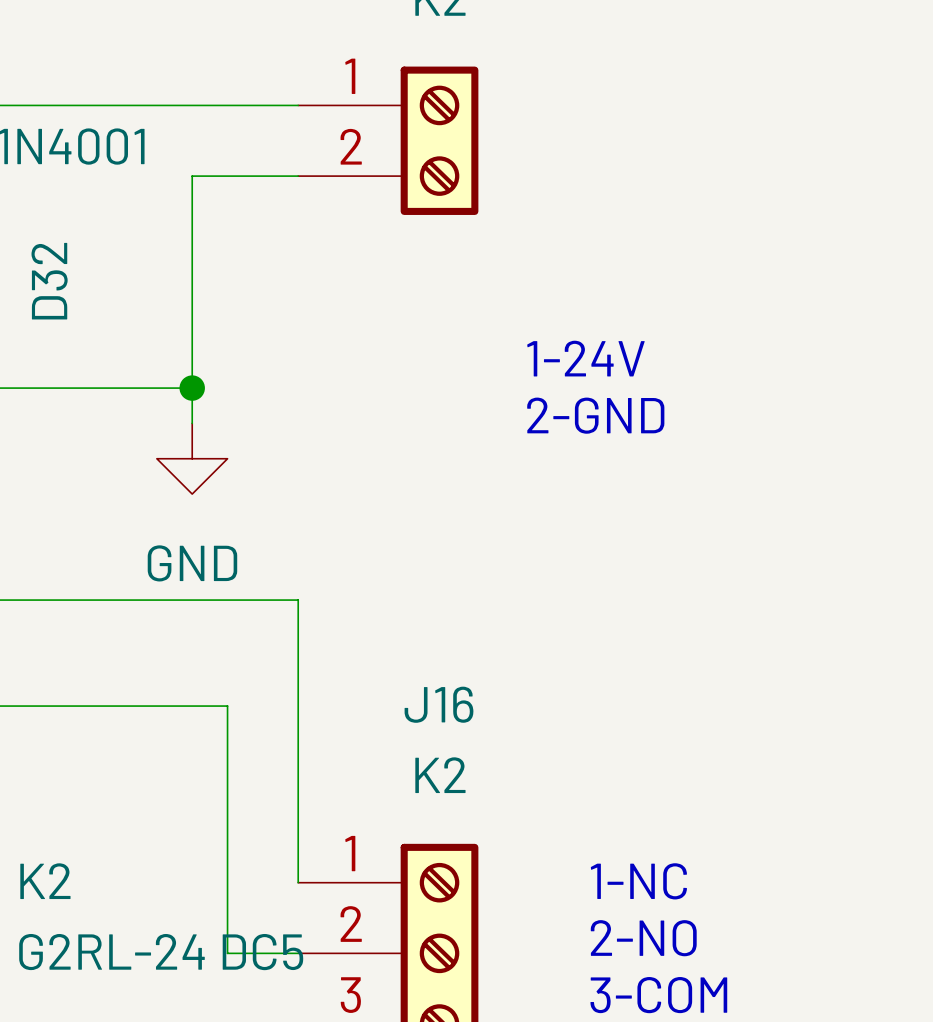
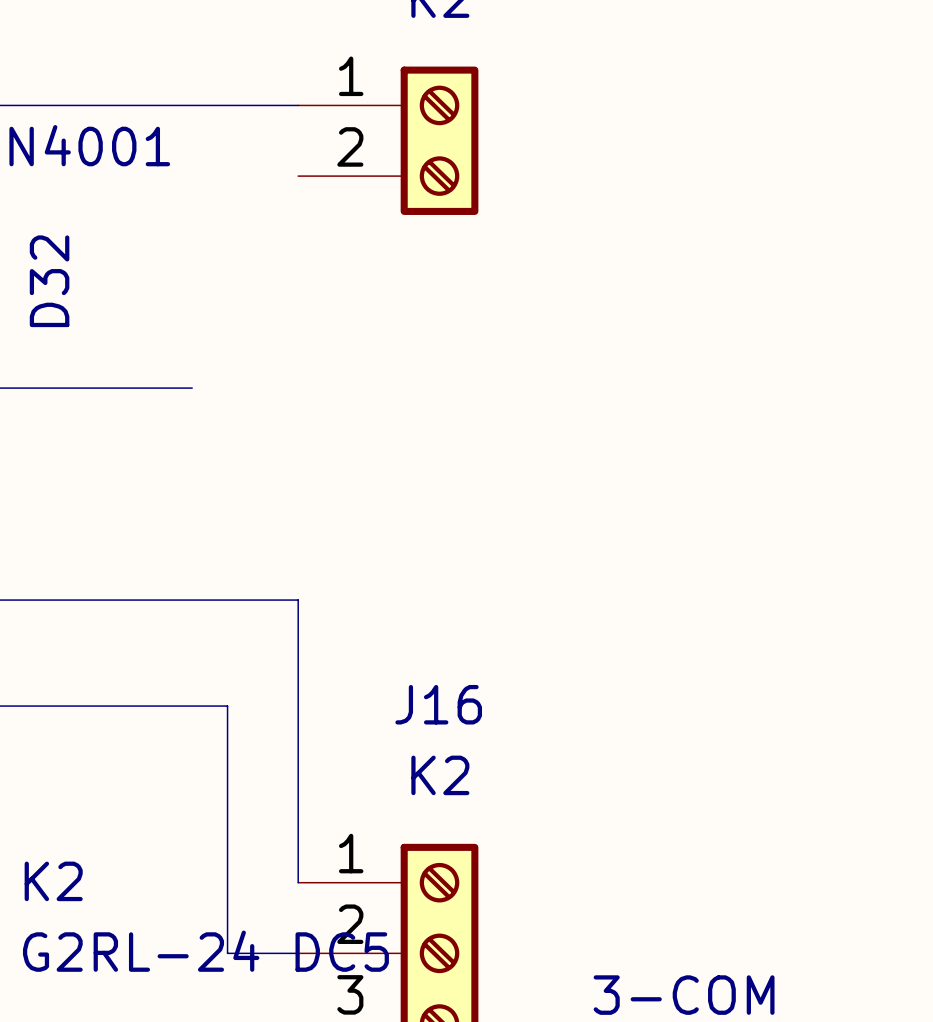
wire: (298, 176) (192, 176) (192, 423) -> none
text: 1-24V (586, 358) -> none
junction: (192, 388) -> none
text: 2-GND (595, 415) -> none
power symbol: GND (192, 458) -> none
text: 1-NC (638, 881) -> none
text: 2-NO (643, 938) -> none

